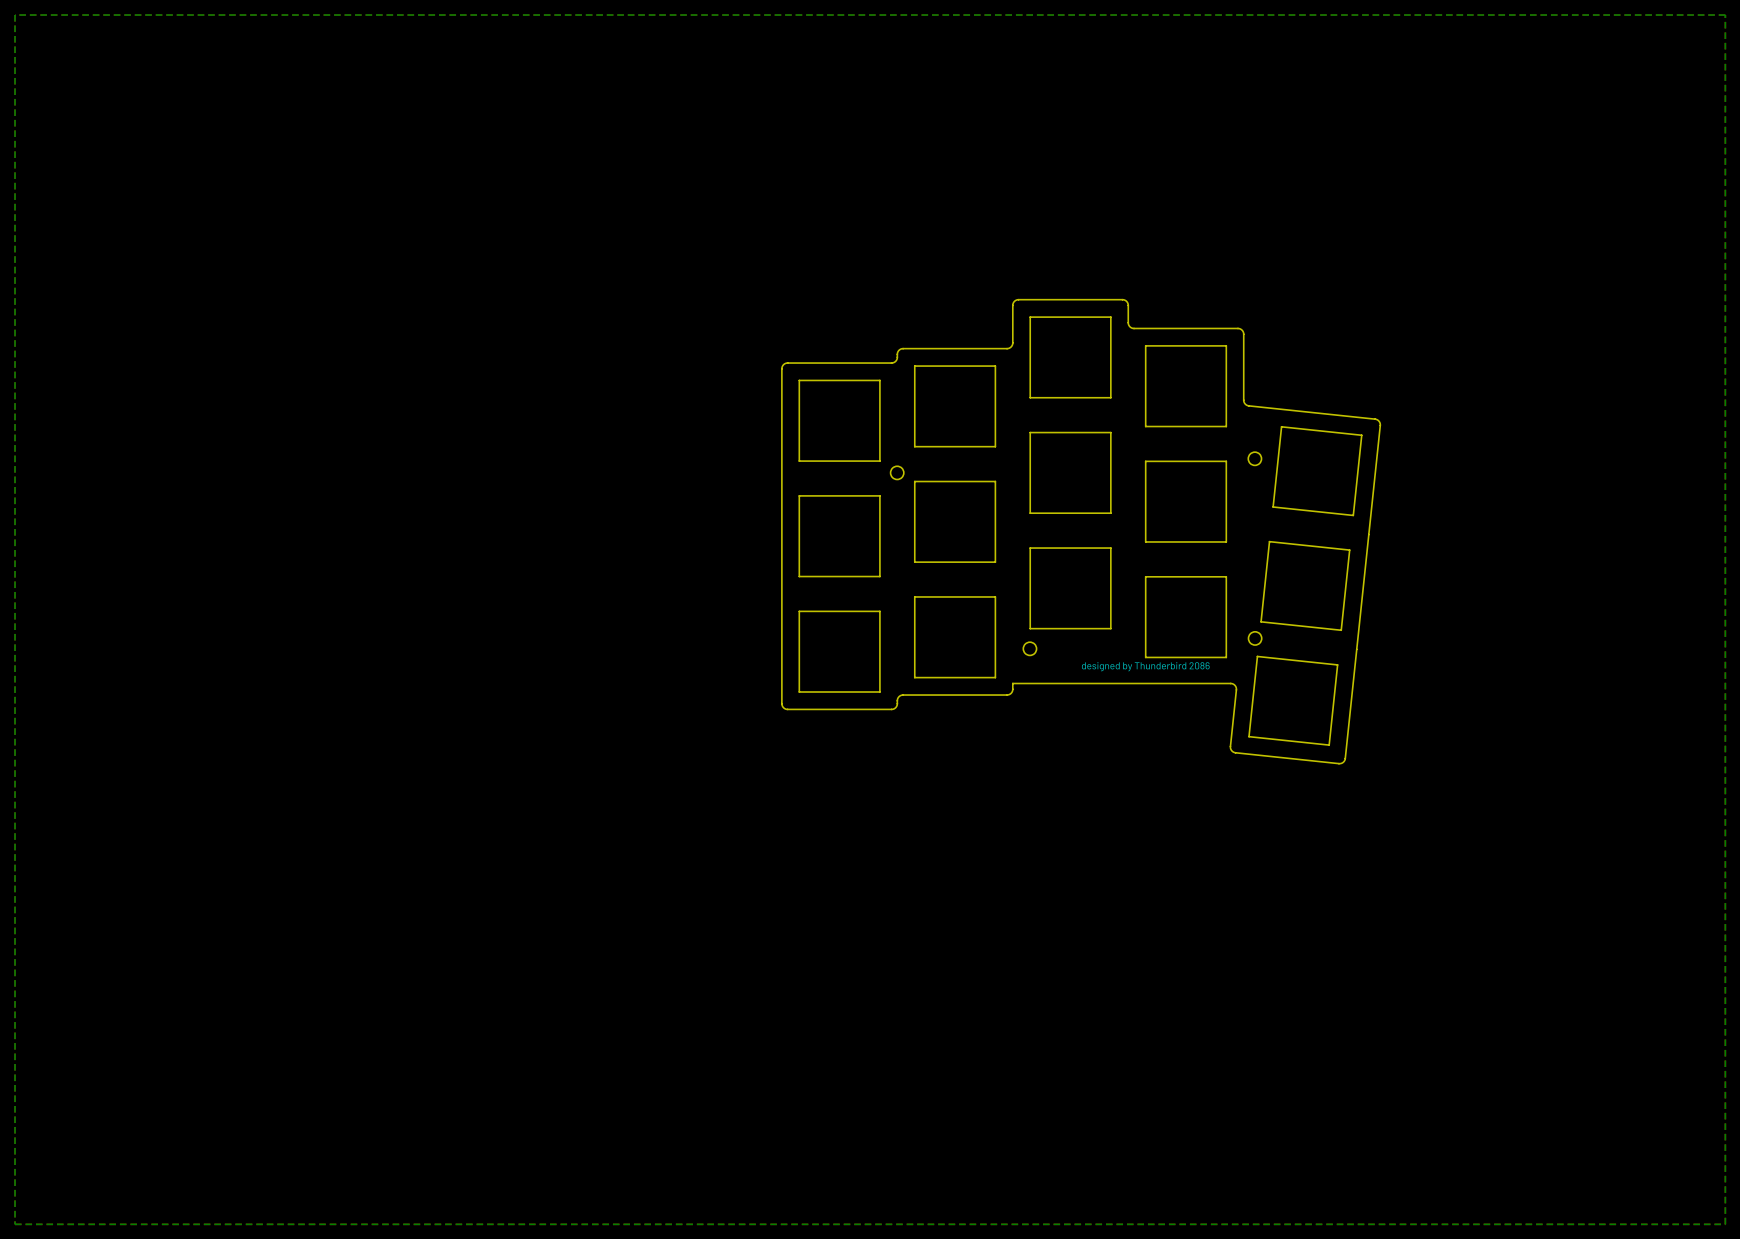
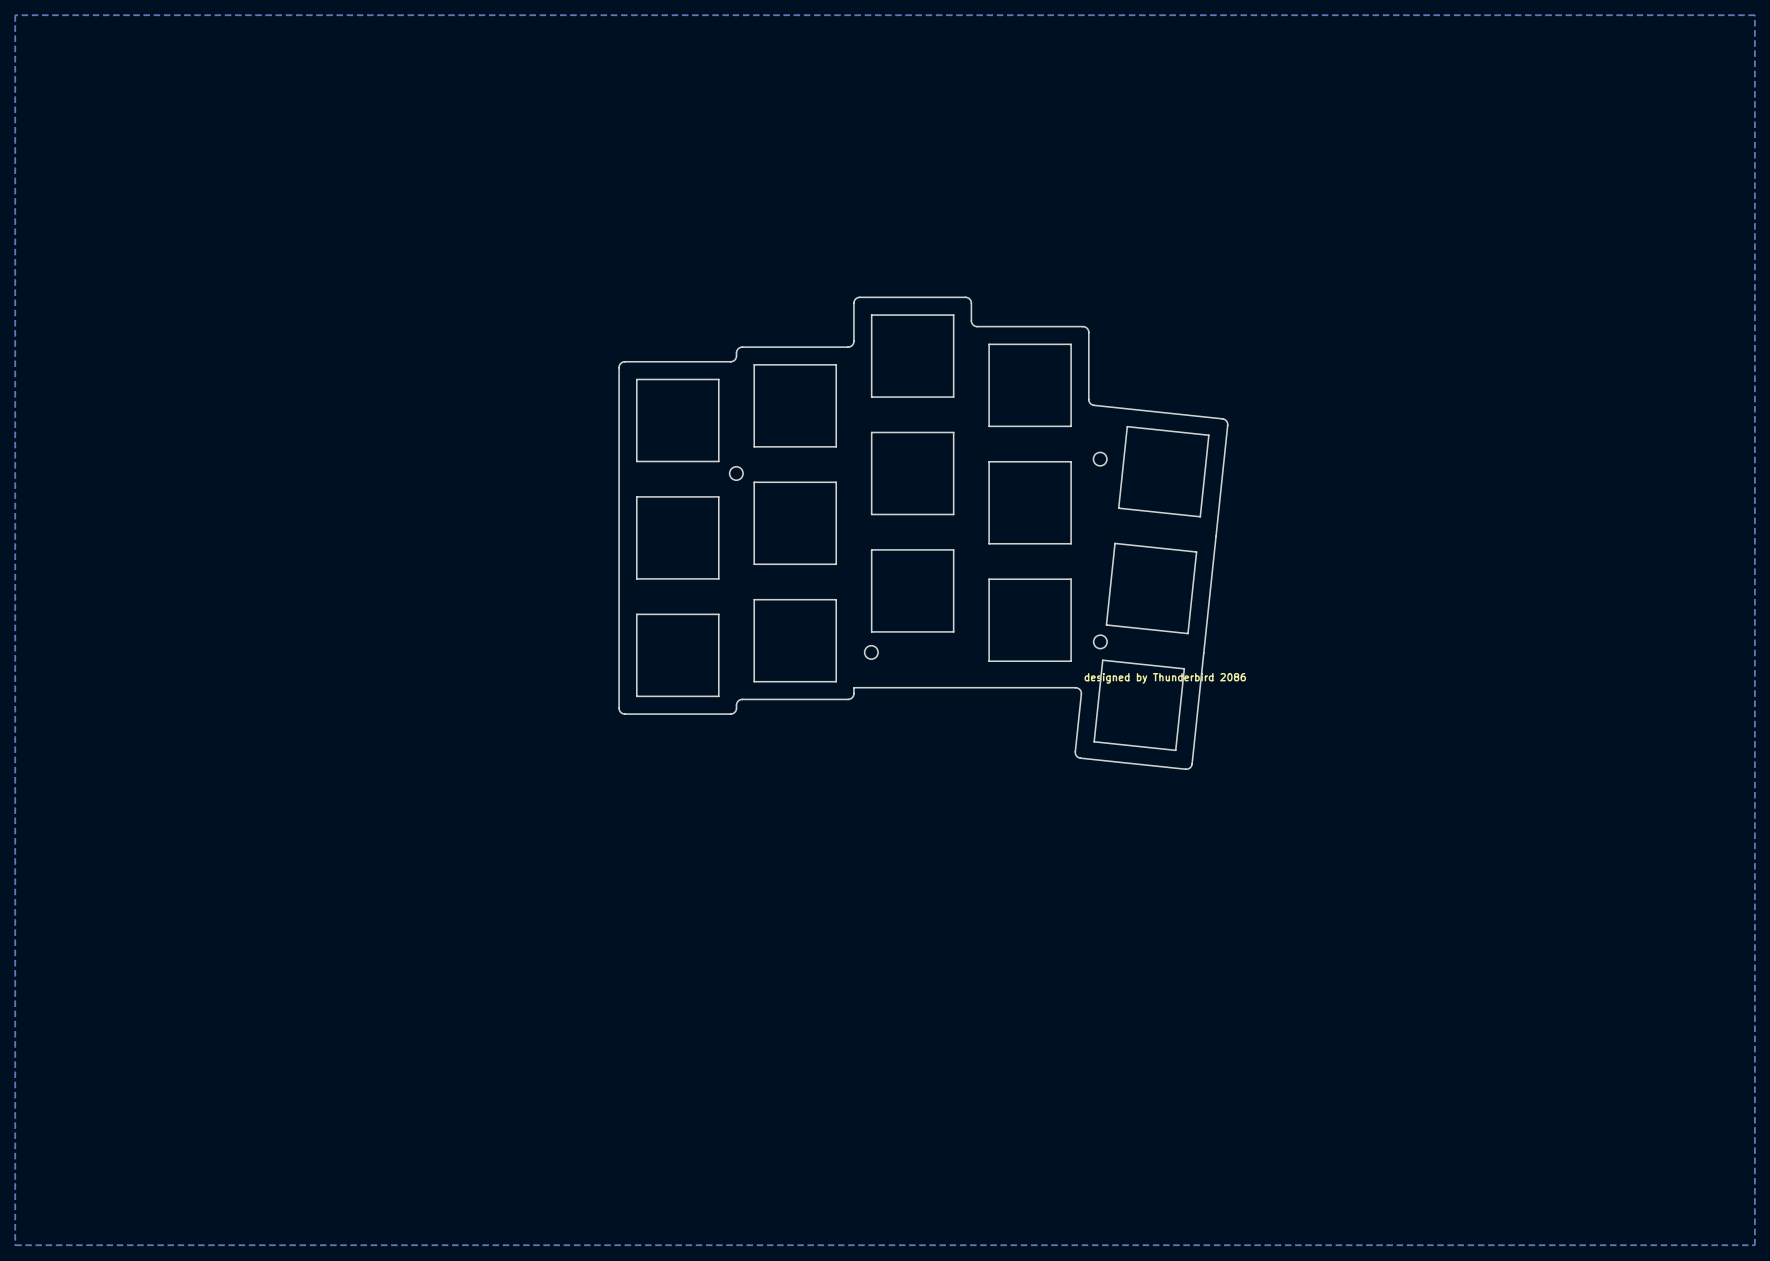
board edge: (1122, 299) (1016, 300) (1012, 304) (1012, 343) (1007, 348) (902, 348) (898, 351) (896, 360) (892, 362) (787, 363) (783, 365) (781, 703) (784, 708) (892, 709) (896, 706) (897, 698) (901, 695) (1007, 694) (1012, 691) (1012, 683) (1231, 683) (1236, 689) (1230, 746) (1233, 751) (1338, 763) (1344, 761) (1379, 422) (1375, 419) (1246, 405) (1243, 400) (1243, 334) (1241, 329) (1132, 328) (1128, 324) (1127, 303) (1122, 299) -> (965, 297) (971, 301) (971, 321) (975, 326) (1086, 327) (1088, 332) (1088, 400) (1092, 404) (1222, 418) (1227, 422) (1190, 767) (1185, 769) (1077, 757) (1075, 751) (1081, 693) (1076, 687) (853, 687) (853, 695) (848, 699) (741, 699) (737, 702) (735, 711) (731, 714) (621, 712) (619, 708) (620, 363) (624, 361) (731, 361) (735, 358) (737, 349) (741, 347) (848, 347) (853, 342) (853, 302) (857, 297) (965, 297)
board edge: (1110, 317) (1110, 397) (1030, 397) (1030, 317) (1110, 317) -> (1071, 344) (1071, 426) (989, 426) (989, 344) (1071, 344)
board edge: (1226, 345) (1226, 426) (1145, 426) (1145, 345) (1226, 345) -> none
board edge: (995, 366) (914, 366) (914, 446) (995, 446) (995, 366) -> (953, 315) (871, 315) (871, 397) (953, 397) (953, 315)
board edge: none -> (718, 379) (718, 461) (636, 461) (636, 379) (718, 379)
board edge: (879, 380) (879, 461) (799, 461) (799, 380) (879, 380) -> (836, 364) (836, 446) (754, 446) (754, 364) (836, 364)
board edge: none -> (1127, 426) (1118, 508) (1200, 516) (1208, 435) (1127, 426)
board edge: (1281, 426) (1273, 507) (1353, 515) (1361, 435) (1281, 426) -> none
board edge: (1110, 432) (1030, 432) (1030, 513) (1110, 513) (1110, 432) -> (1071, 461) (989, 461) (989, 543) (1071, 543) (1071, 461)
round board edge: none -> [1093, 451, 1108, 467]
round board edge: [1247, 451, 1262, 466] -> none
round board edge: none -> [729, 466, 744, 481]
board edge: (1226, 461) (1145, 461) (1145, 541) (1226, 541) (1226, 461) -> none
round board edge: [890, 465, 905, 480] -> none
board edge: (995, 481) (995, 562) (914, 562) (914, 481) (995, 481) -> (953, 432) (953, 514) (871, 514) (871, 432) (953, 432)
board edge: none -> (718, 496) (718, 578) (636, 578) (636, 496) (718, 496)
board edge: (879, 495) (879, 576) (799, 576) (799, 495) (879, 495) -> (836, 482) (836, 564) (754, 564) (754, 482) (836, 482)
board edge: none -> (1115, 543) (1106, 625) (1188, 633) (1196, 552) (1115, 543)
board edge: (1269, 541) (1261, 621) (1341, 630) (1349, 550) (1269, 541) -> none
board edge: (1110, 548) (1110, 628) (1030, 628) (1030, 548) (1110, 548) -> (1071, 579) (1071, 661) (989, 661) (989, 579) (1071, 579)
board edge: (1226, 576) (1145, 576) (1145, 657) (1226, 657) (1226, 576) -> none
board edge: (995, 596) (914, 596) (914, 677) (995, 677) (995, 596) -> (953, 549) (871, 549) (871, 631) (953, 631) (953, 549)
board edge: none -> (718, 614) (718, 696) (636, 696) (636, 614) (718, 614)
board edge: (879, 611) (879, 692) (799, 692) (799, 611) (879, 611) -> (836, 599) (836, 681) (754, 681) (754, 599) (836, 599)
round board edge: [1248, 631, 1263, 646] -> none
round board edge: none -> [864, 645, 879, 660]
round board edge position: (1029, 648) -> (1100, 641)
board edge: none -> (1102, 660) (1094, 741) (1175, 750) (1184, 668) (1102, 660)
board edge: (1257, 656) (1249, 736) (1329, 745) (1337, 664) (1257, 656) -> none

